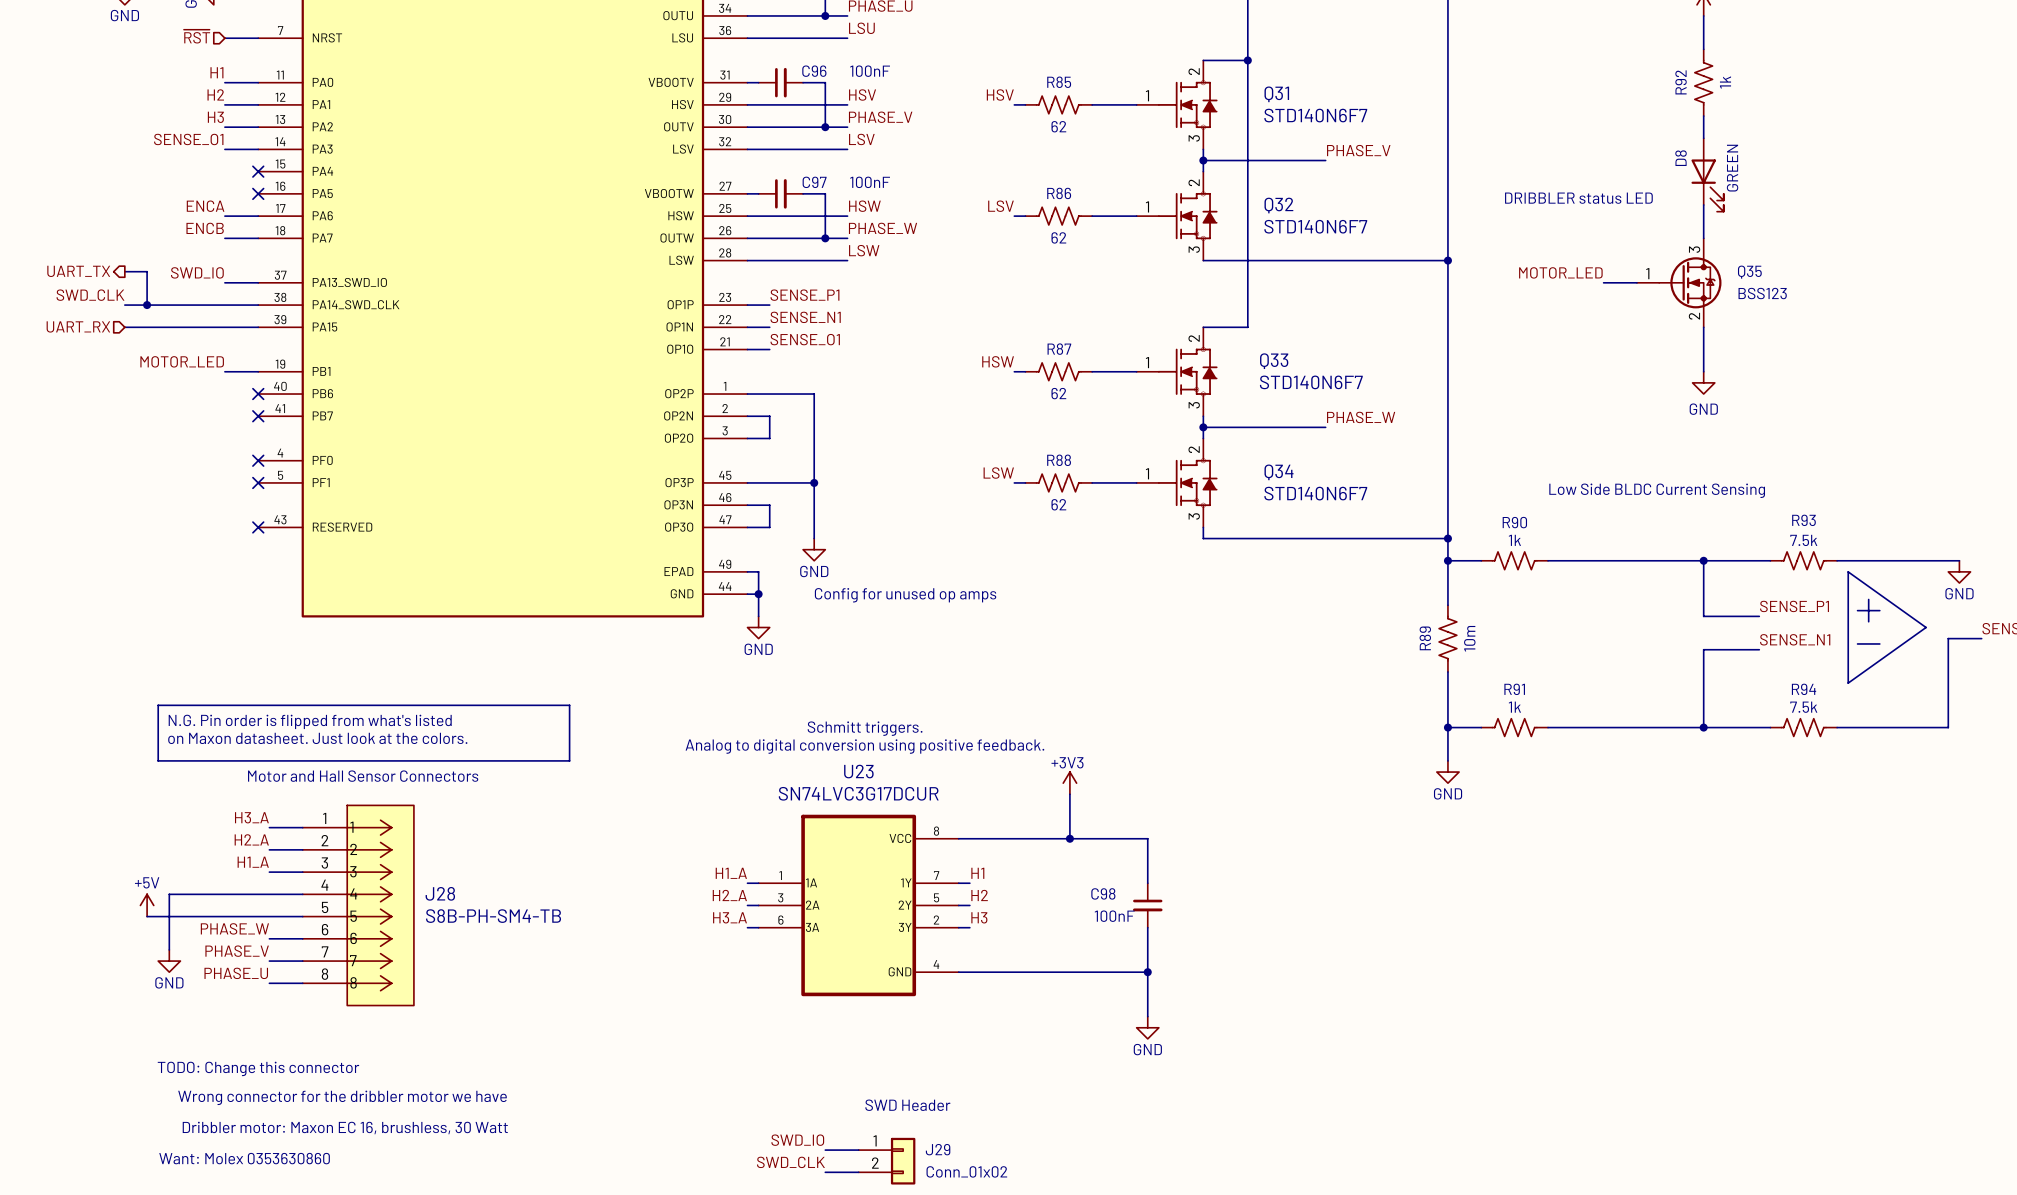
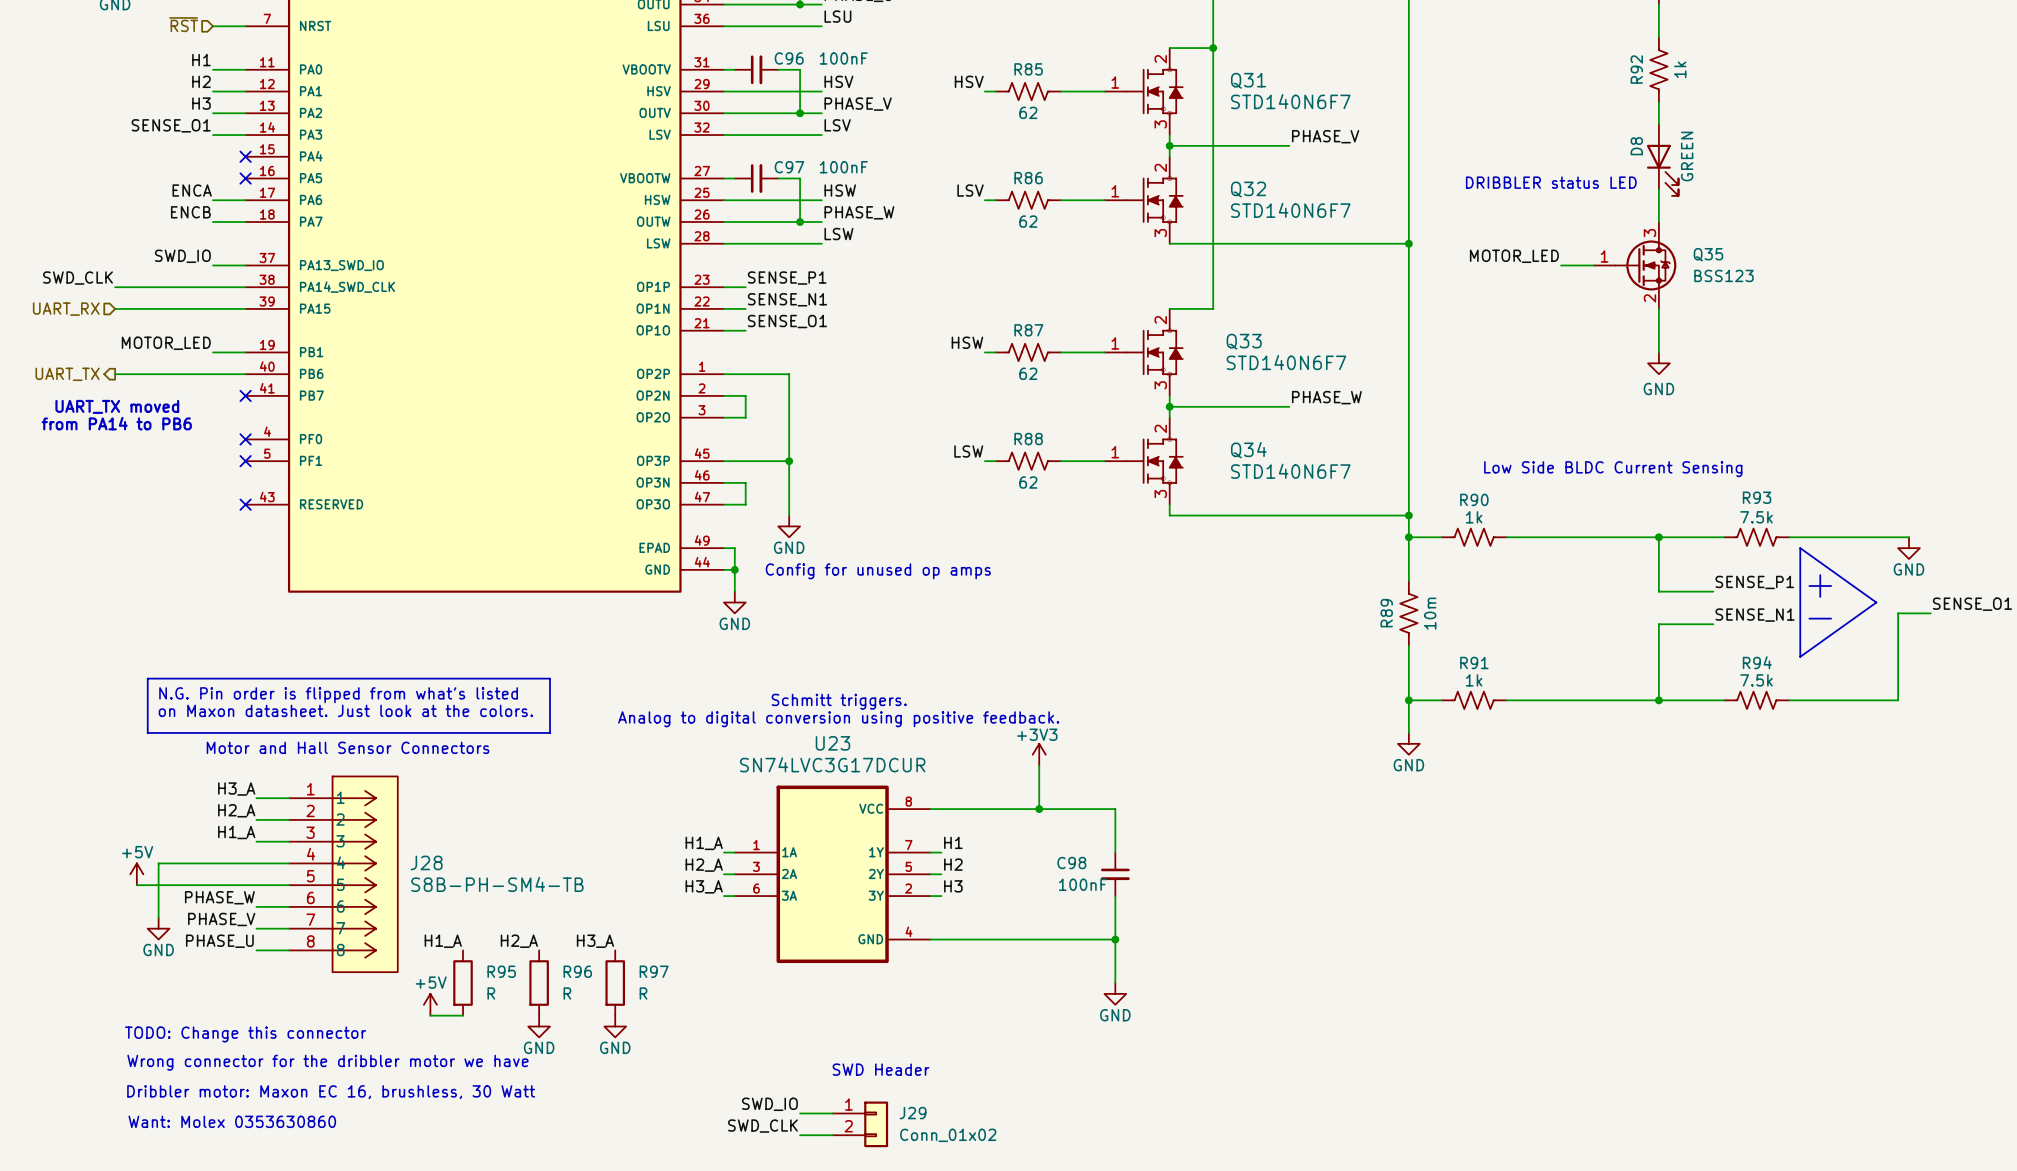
hierarchical label position: UART_TX (78, 271) -> UART_TX (67, 374)
wire: (124, 271) (147, 271) (147, 305) -> none
junction: (147, 305) -> none
wire: none -> (115, 374) (245, 374)
no-connect mark: (258, 394) -> none
text: none -> UART_TX moved (117, 406)
text: none -> from PA14 to PB6 (116, 423)
label: none -> H1_A (443, 941)
label: none -> H2_A (519, 941)
label: none -> H3_A (595, 941)
R95: none -> R (463, 983)
R96: none -> R (539, 983)
R97: none -> R (615, 983)
power symbol: none -> +5V (430, 1004)
wire: none -> (430, 1015) (463, 1015)
power symbol: none -> GND (539, 1026)
power symbol: none -> GND (615, 1026)

